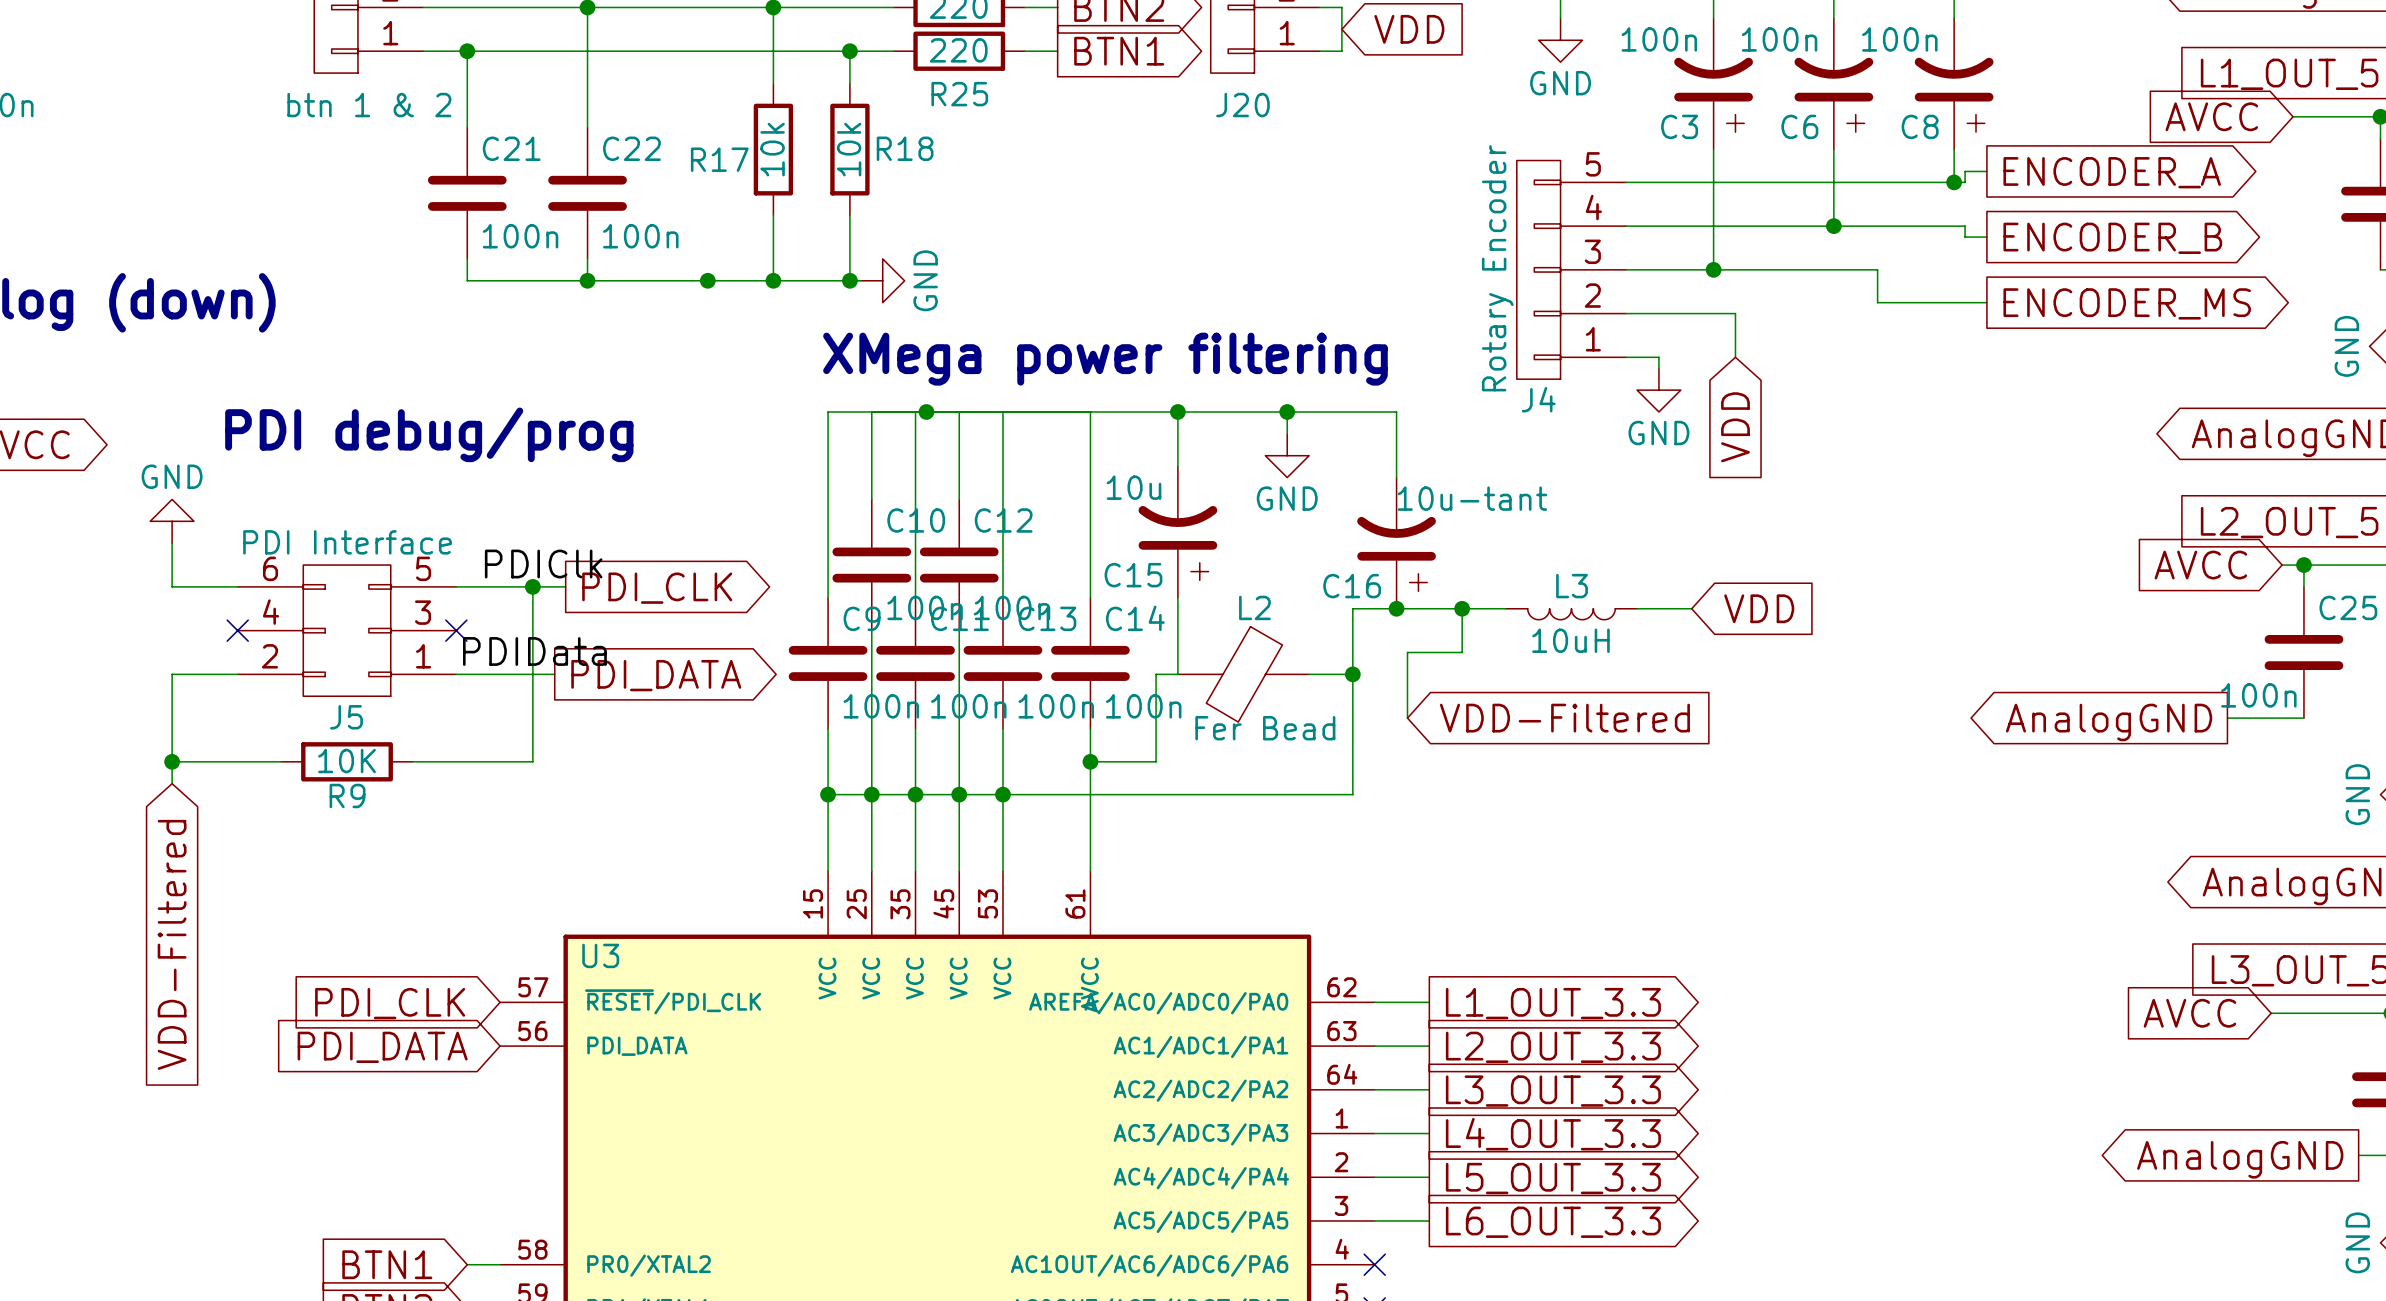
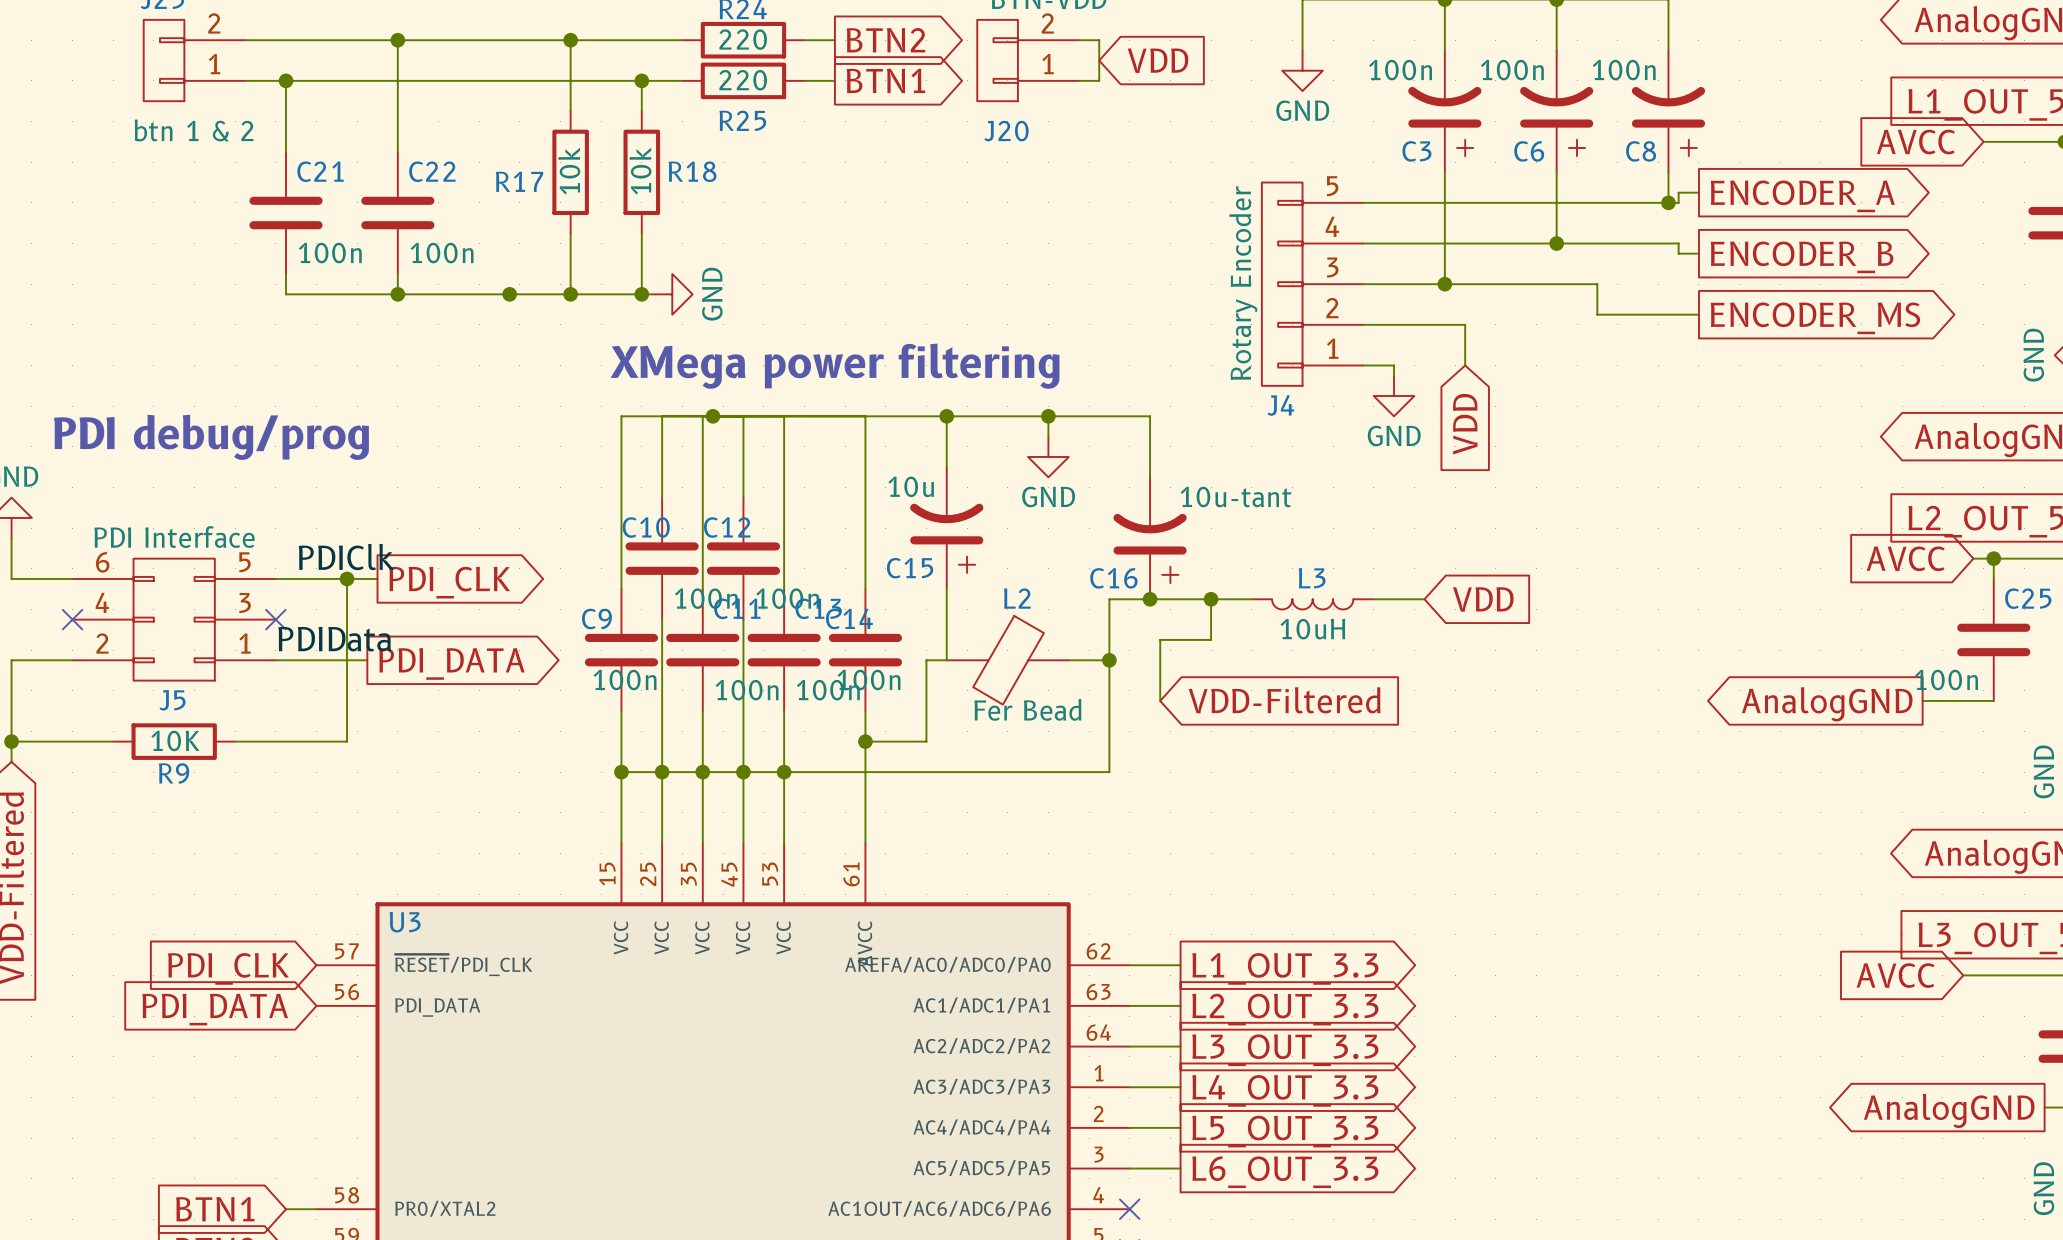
C10 name position: C10 (916, 520) -> C10 (646, 527)
C12 name position: C12 (1003, 520) -> C12 (727, 527)
C9 name position: C9 (862, 618) -> C9 (596, 619)
C14 name position: C14 (1135, 618) -> C14 (849, 618)
C9 value position: 100n (881, 706) -> 100n (625, 679)
C14 value position: 100n (1143, 706) -> 100n (869, 679)

